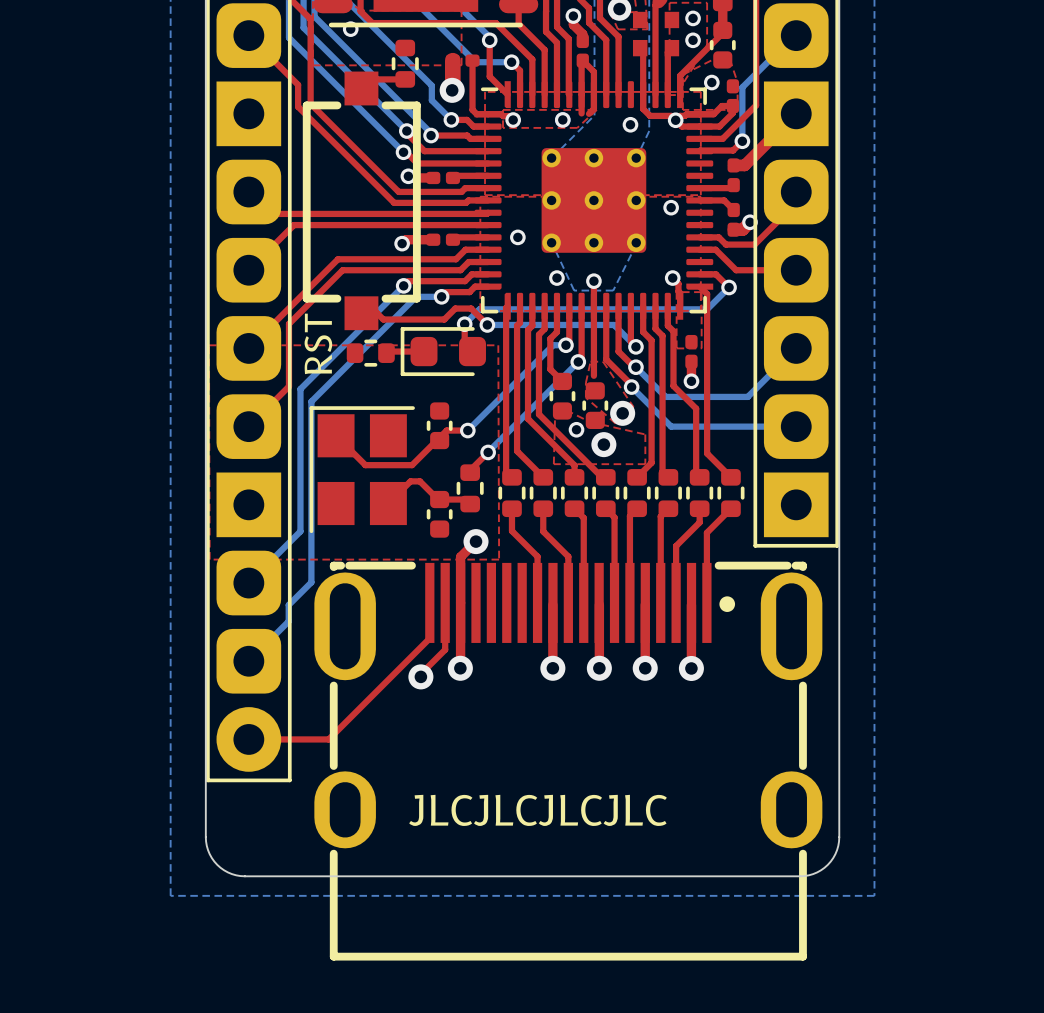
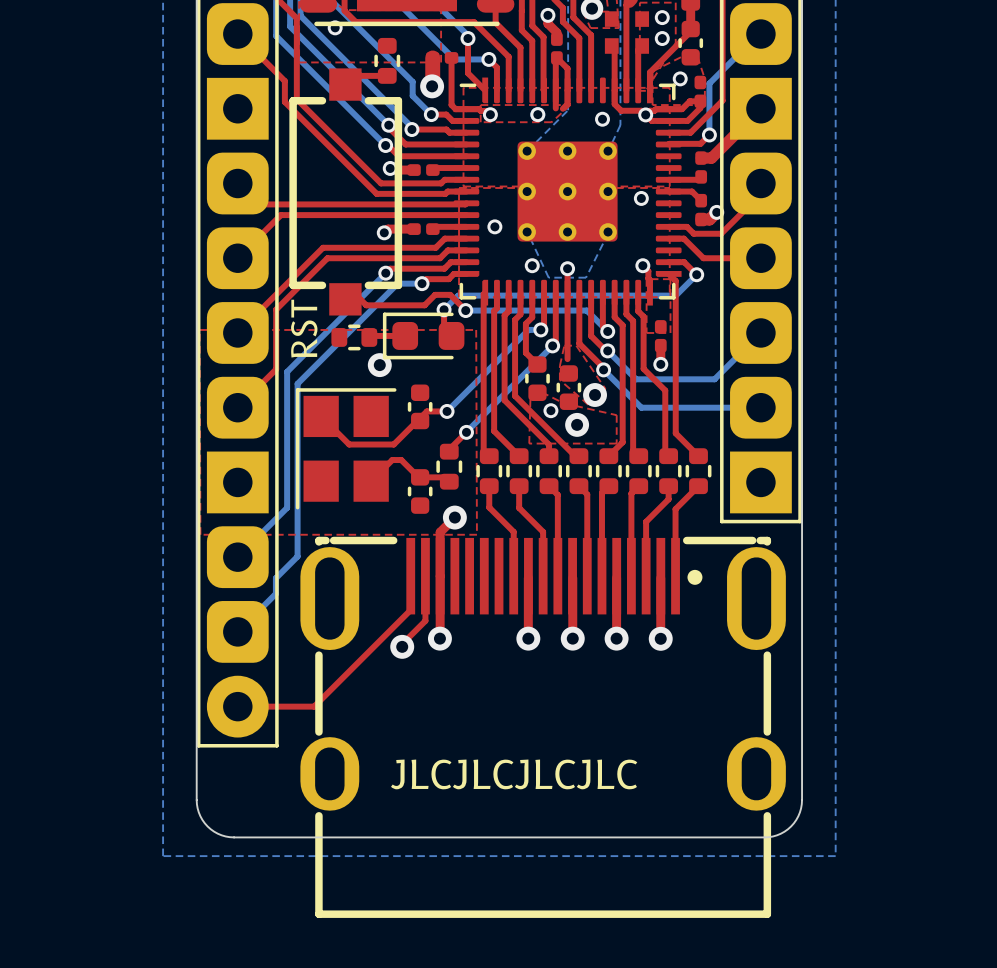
via: none -> (379, 365)

